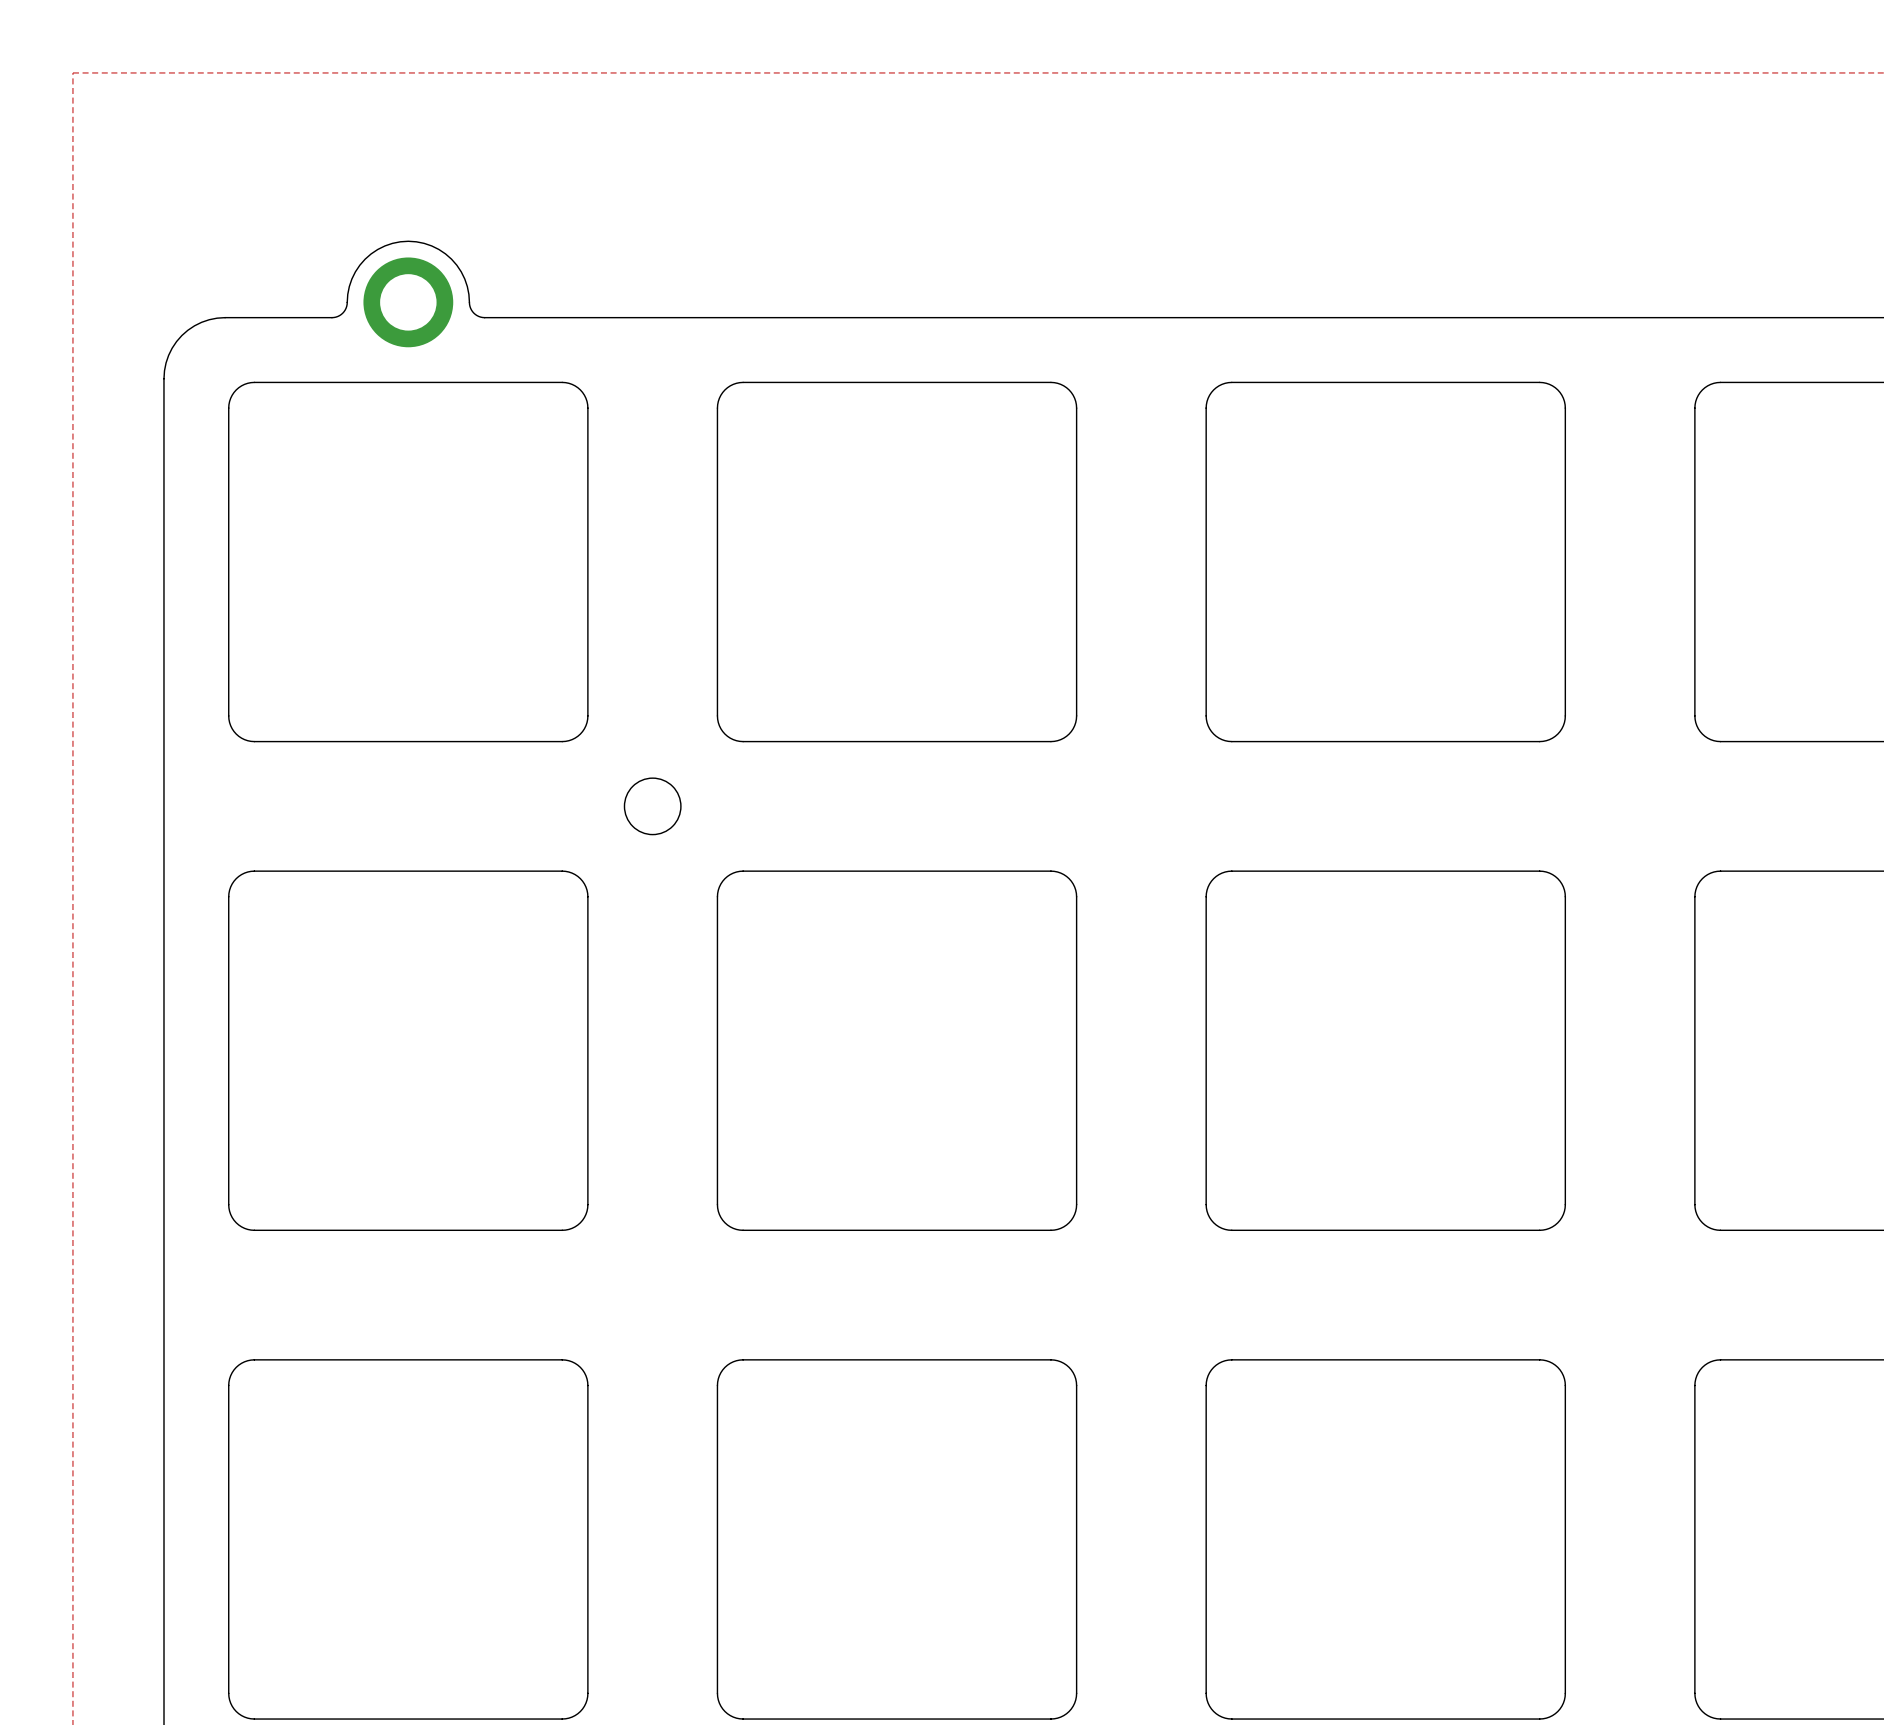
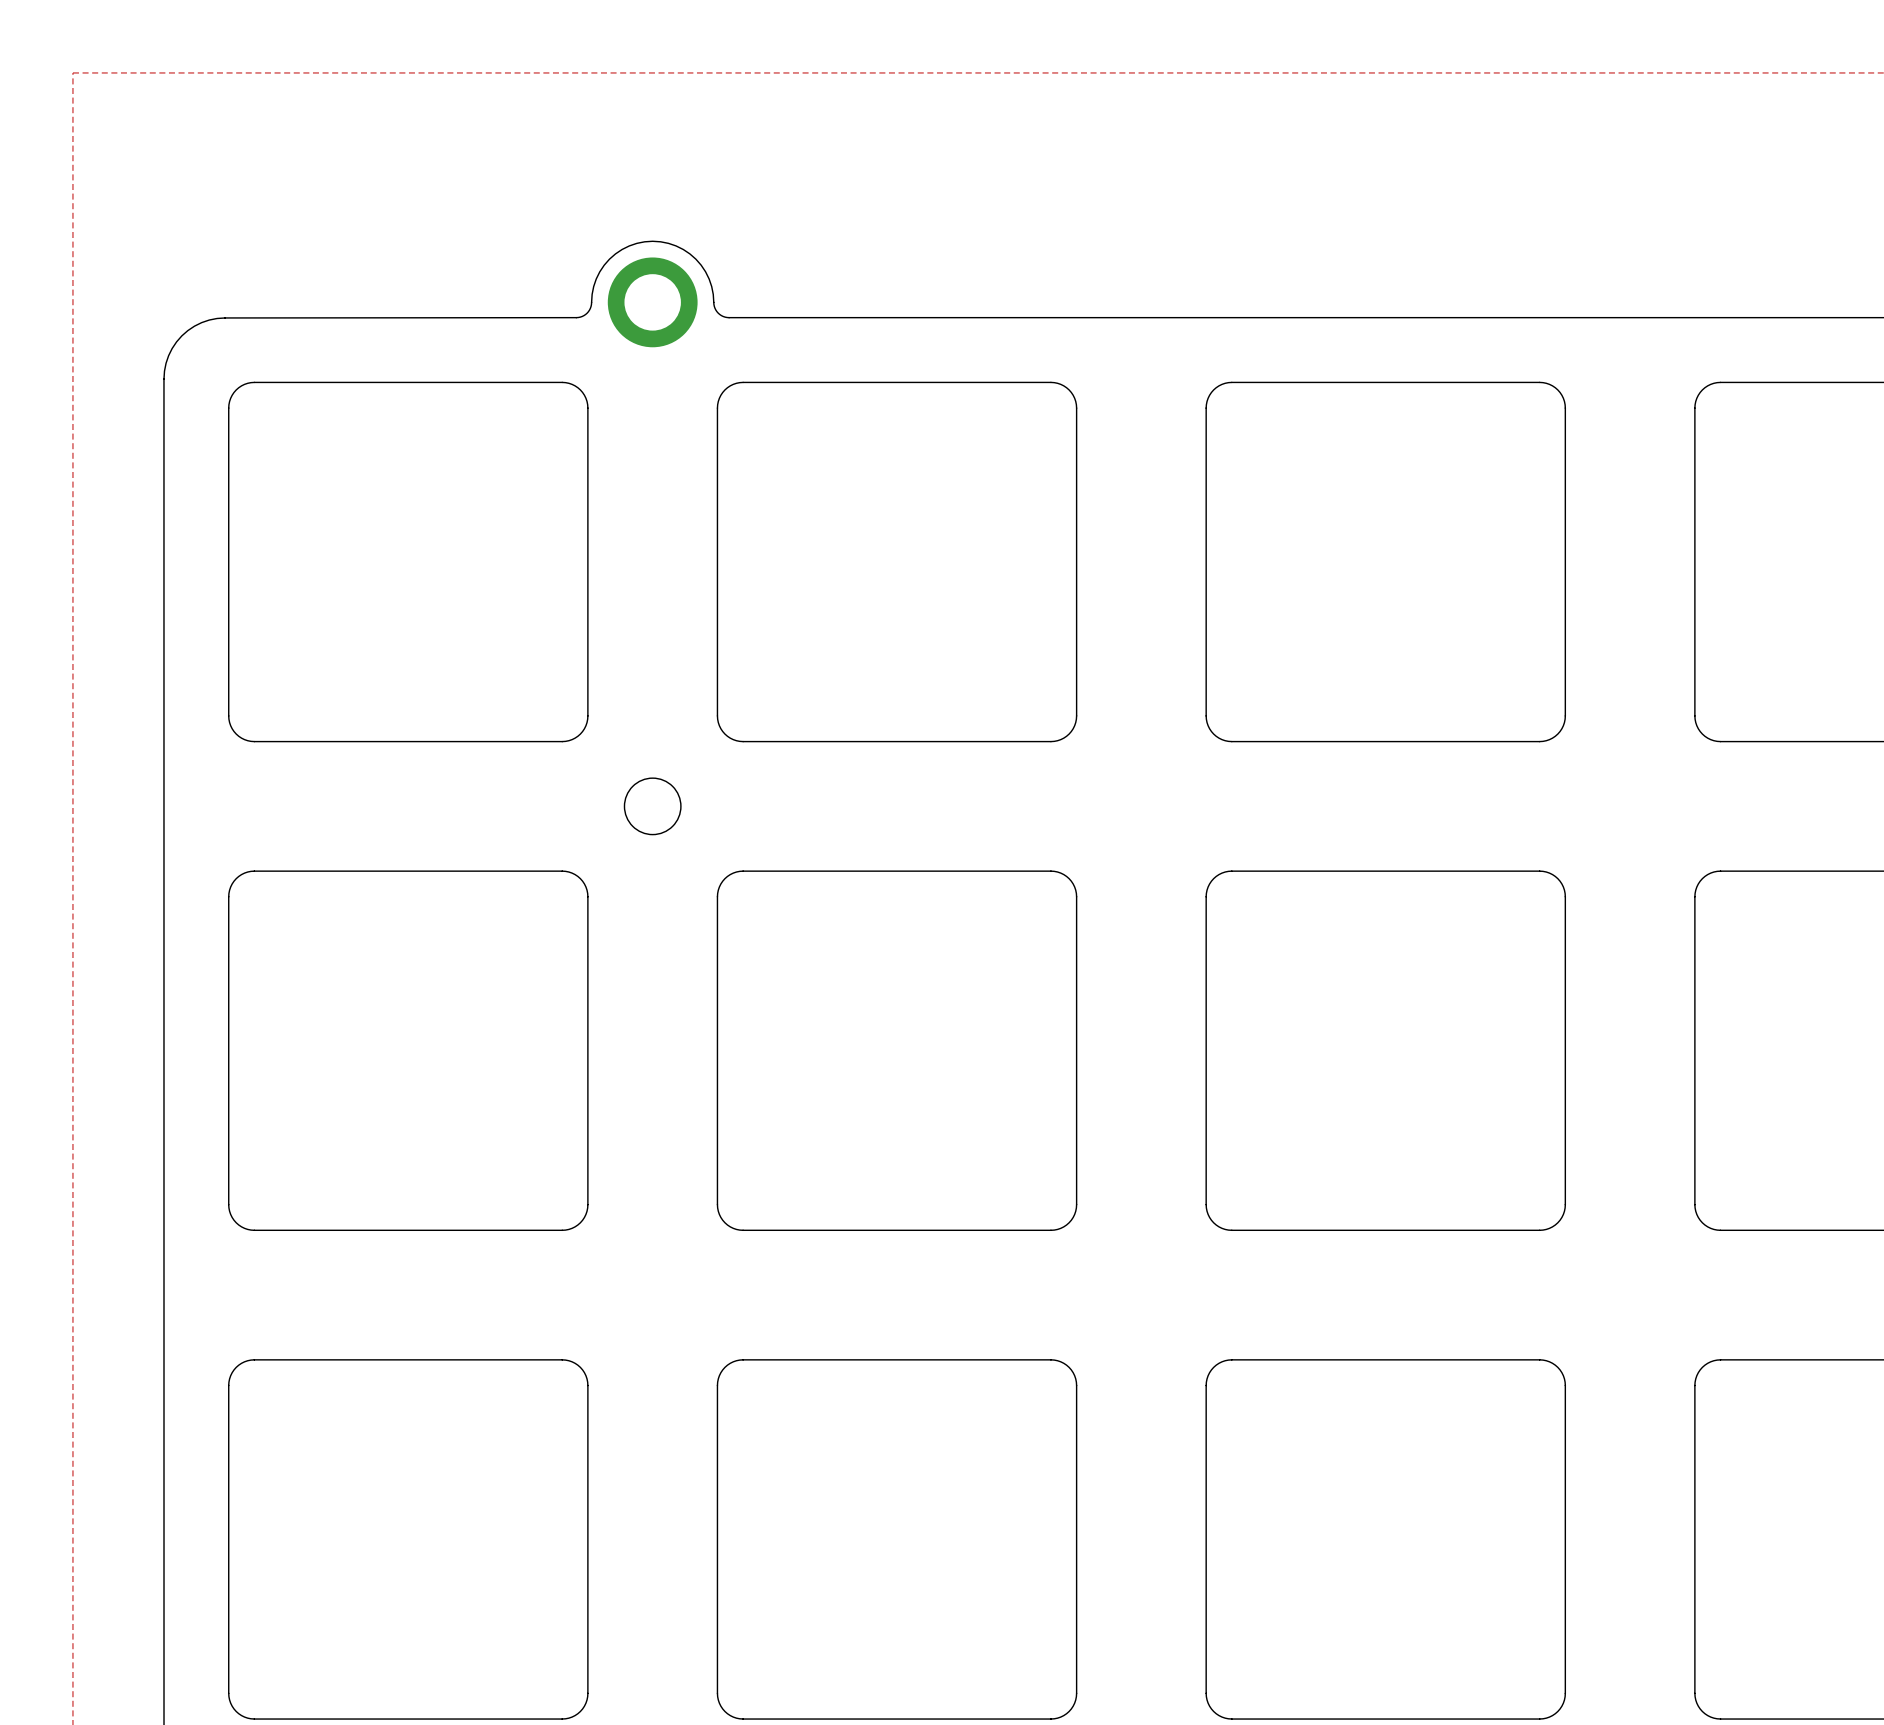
part position: (408, 302) -> (652, 302)
board edge: (729, 317) (480, 317) (471, 310) (464, 278) (451, 259) (431, 245) (416, 241) (400, 241) (377, 249) (359, 265) (349, 286) (346, 308) (339, 315) (331, 317) (225, 317) (201, 322) (181, 335) (172, 348) (166, 362) (163, 378) -> (729, 317) (721, 315) (715, 310) (709, 278) (695, 259) (676, 245) (660, 241) (644, 241) (622, 249) (604, 265) (593, 286) (590, 308) (585, 314) (580, 317) (217, 318) (201, 322) (181, 335) (168, 355) (163, 379)

